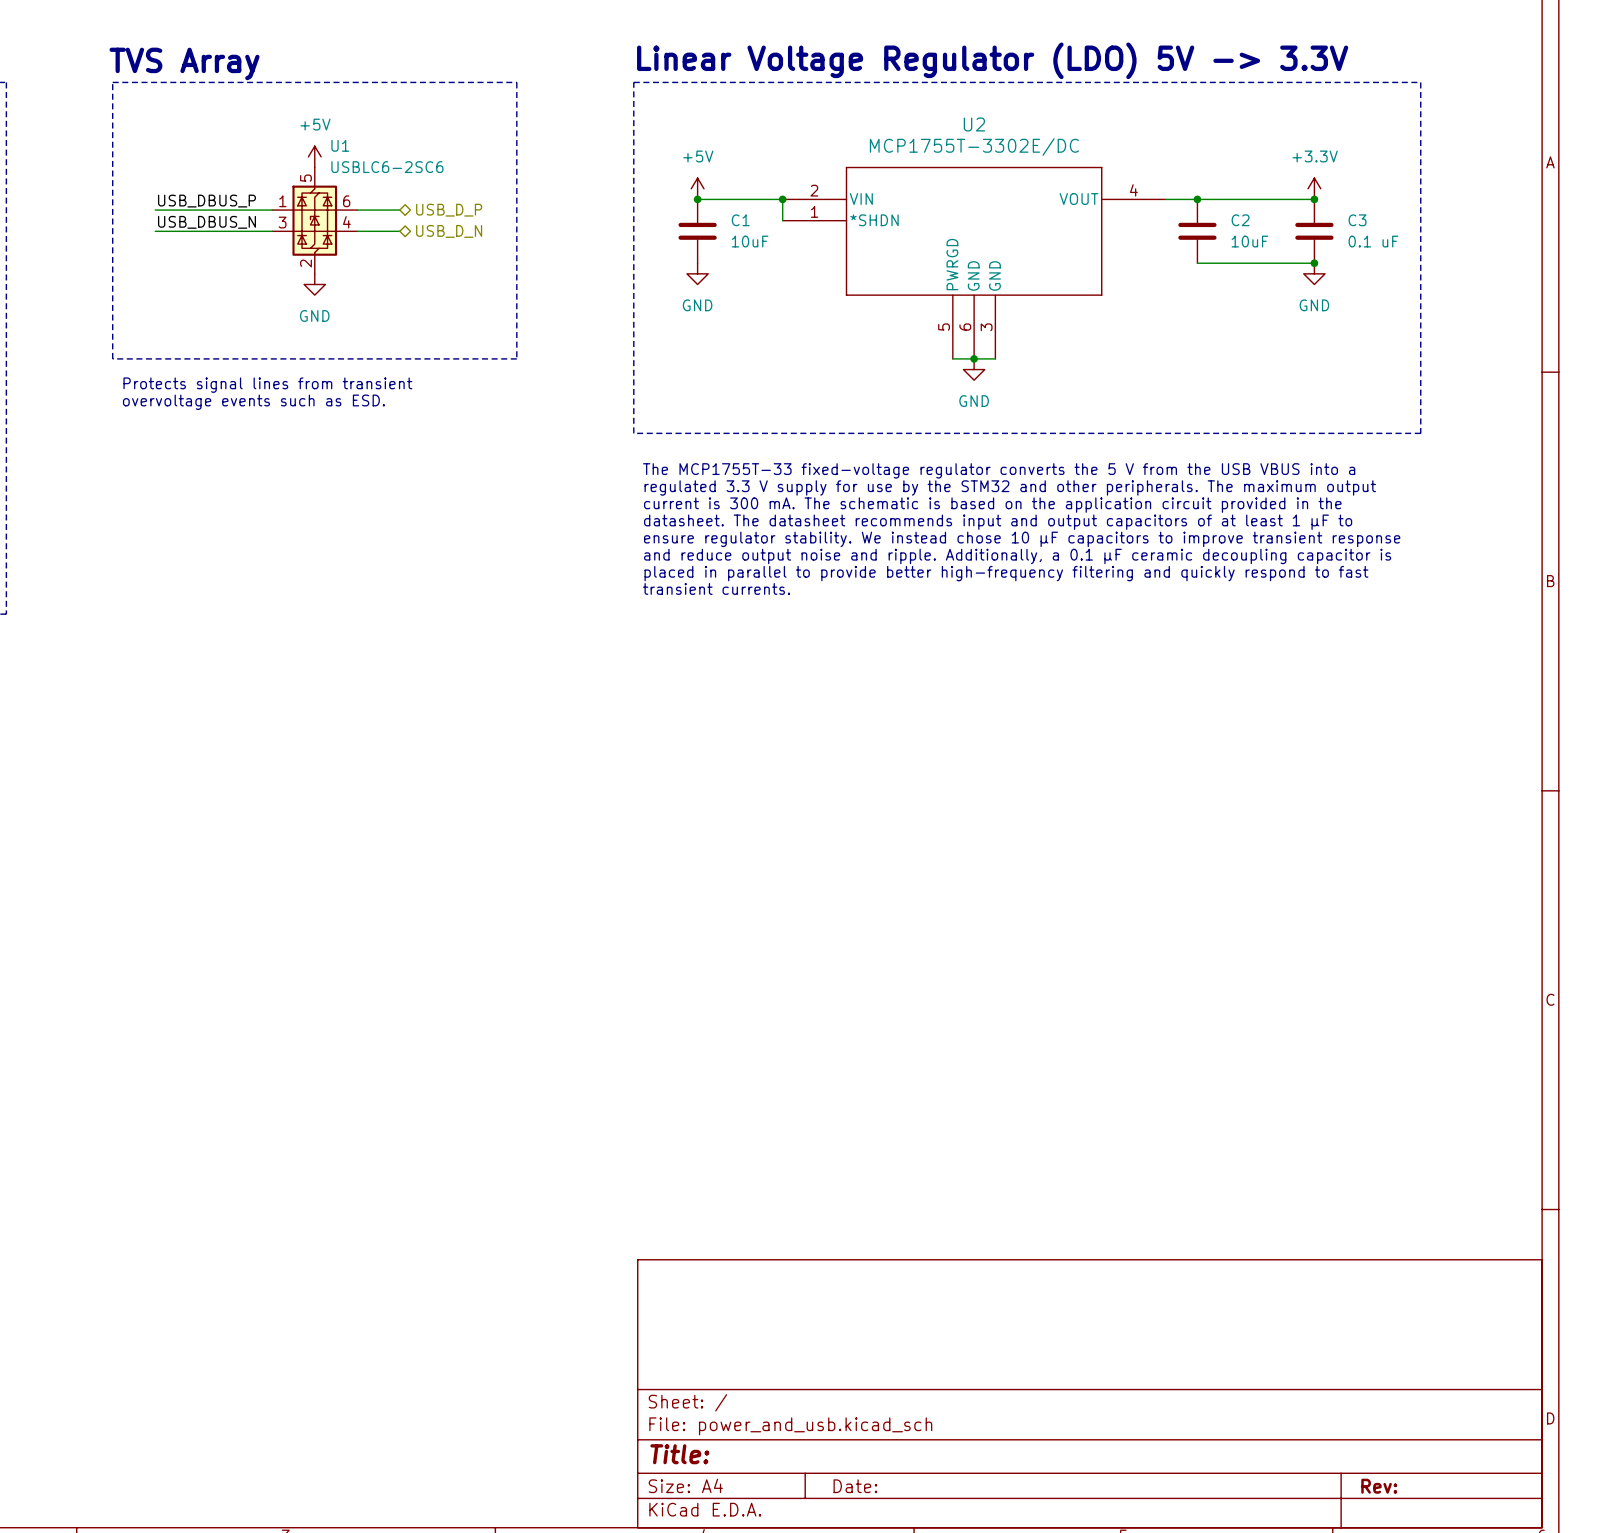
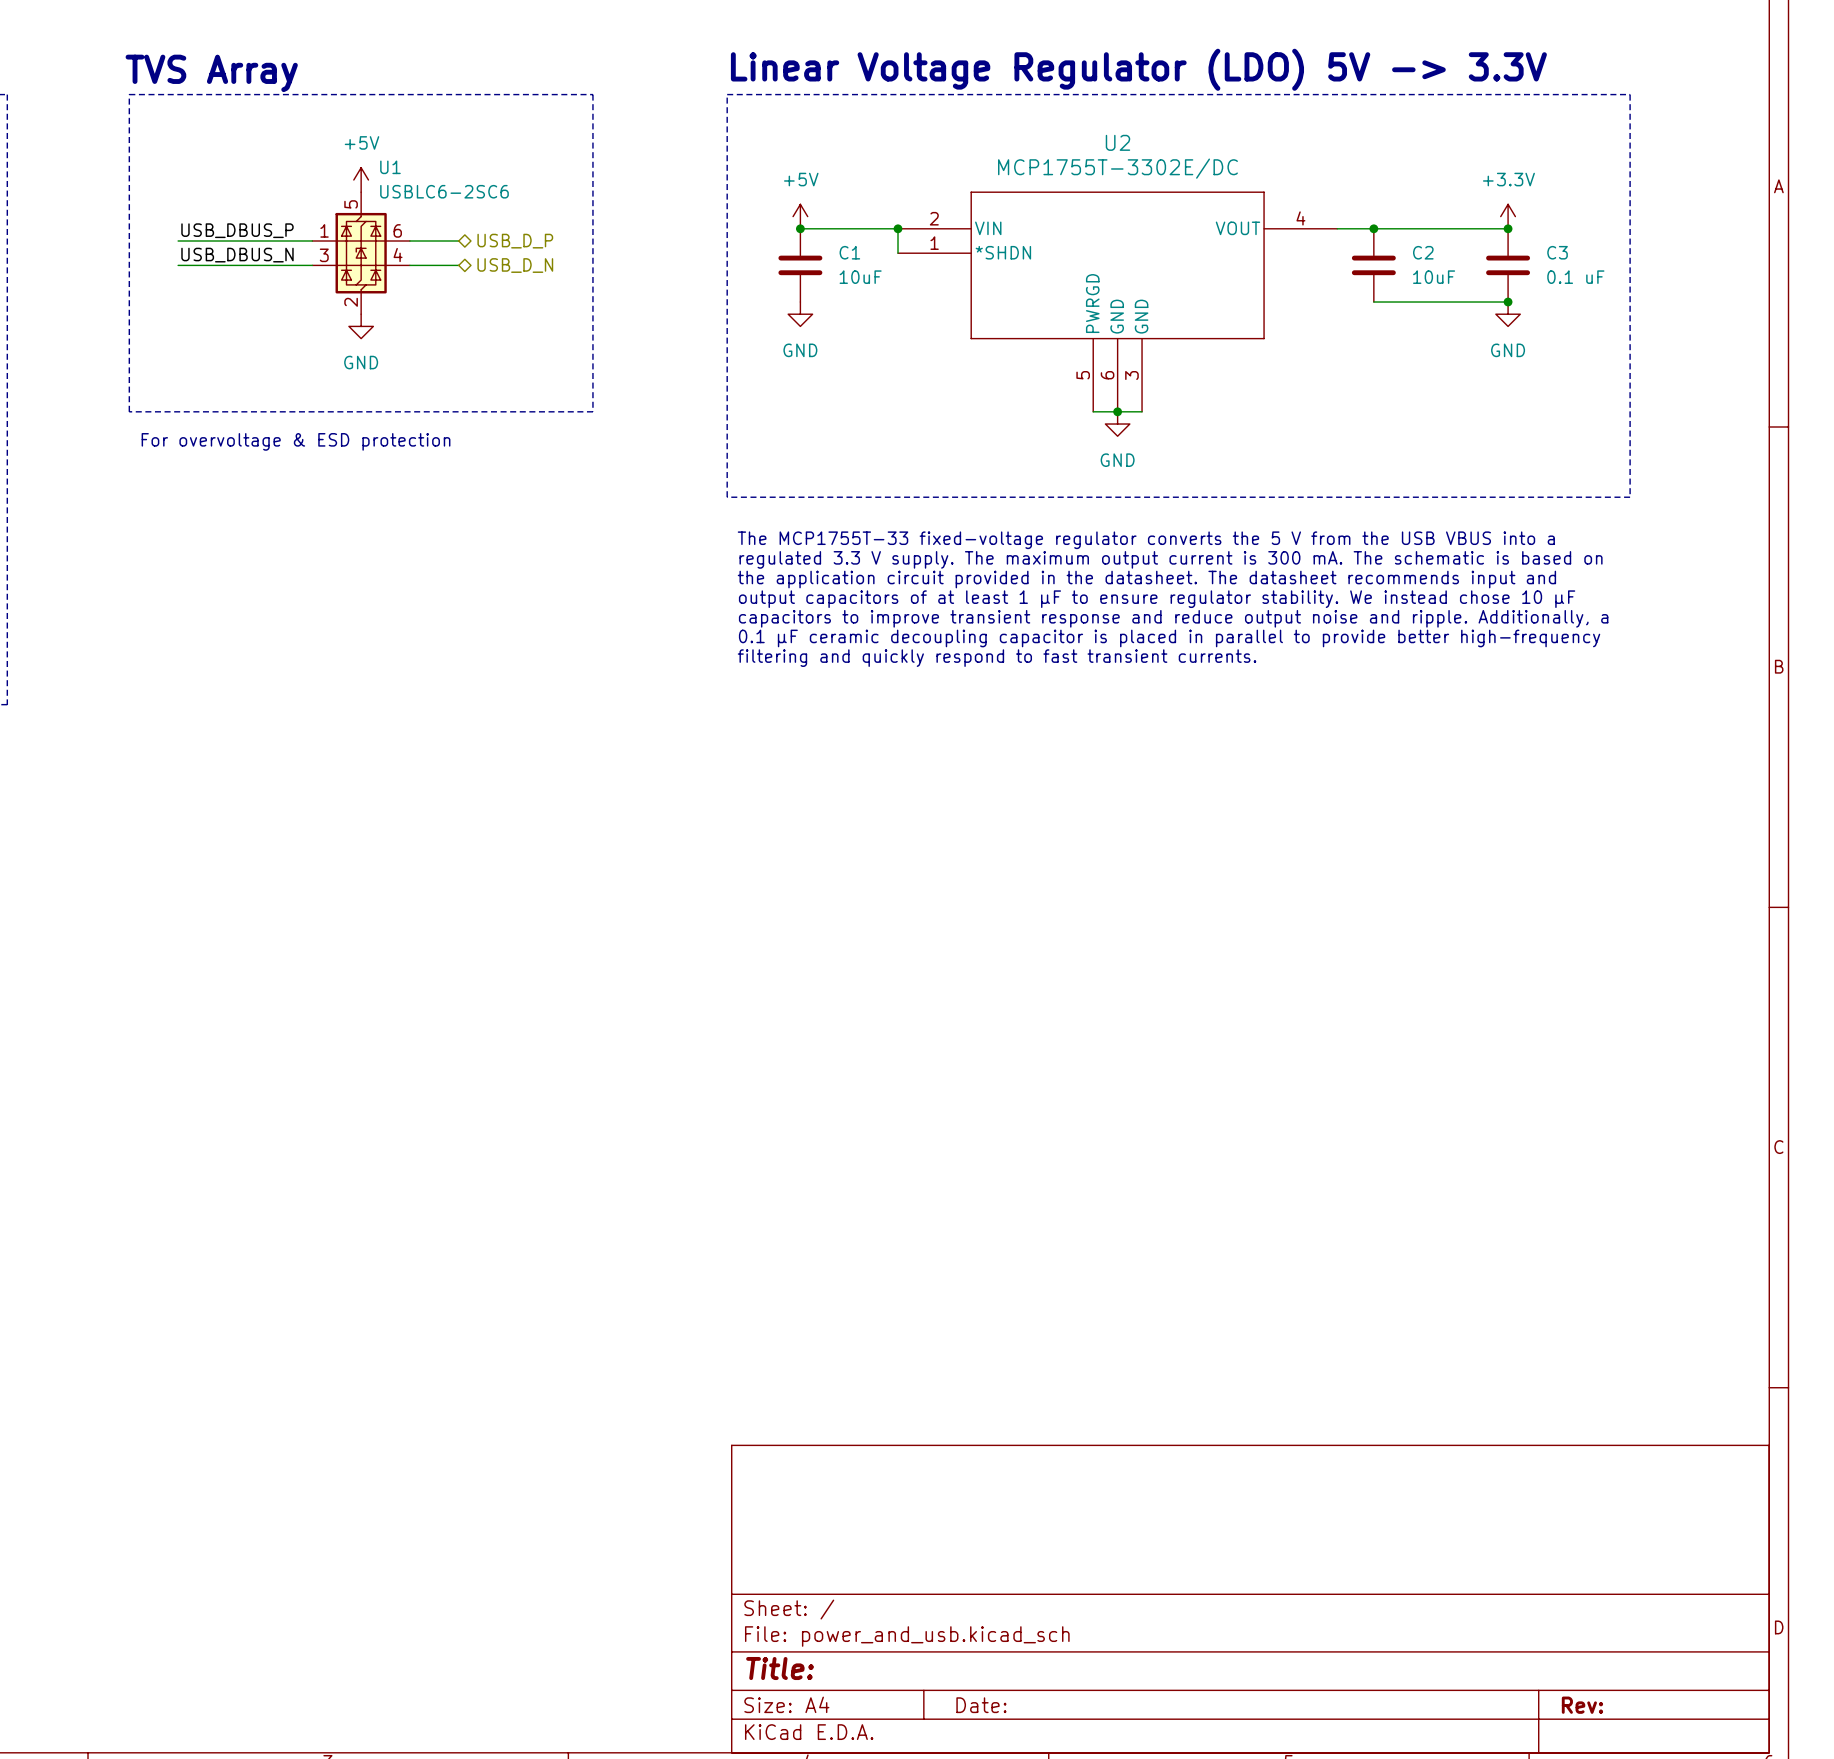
text: Protects signal lines from transient (267, 385) -> For overvoltage & ESD protection (296, 441)
text: overvoltage events such as ESD. (253, 402) -> none
text: regulated 3.3 V supply for use by the STM32 and other peripherals. The maximum output (1010, 487) -> regulated 3.3 V supply. The maximum output current is 300 mA. The schematic is based on (1171, 559)
text: current is 300 mA. The schematic is based on the application circuit provided in the (992, 505) -> the application circuit provided in the datasheet. The datasheet recommends input and (1146, 579)
text: datasheet. The datasheet recommends input and output capacitors of at least 1 µF to (998, 522) -> output capacitors of at least 1 µF to ensure regulator stability. We instead chose 10 µF (1157, 599)
text: ensure regulator stability. We instead chose 10 µF capacitors to improve transient response (1022, 539) -> capacitors to improve transient response and reduce output noise and ripple. Additionally, a (1173, 618)
text: and reduce output noise and ripple. Additionally, a 0.1 µF ceramic decoupling capacitor is (1017, 556) -> 0.1 µF ceramic decoupling capacitor is placed in parallel to provide better high-frequency (1169, 638)
text: placed in parallel to provide better high-frequency filtering and quickly respond to fast (1006, 573) -> filtering and quickly respond to fast transient currents. (997, 658)
text: transient currents. (716, 588) -> none

